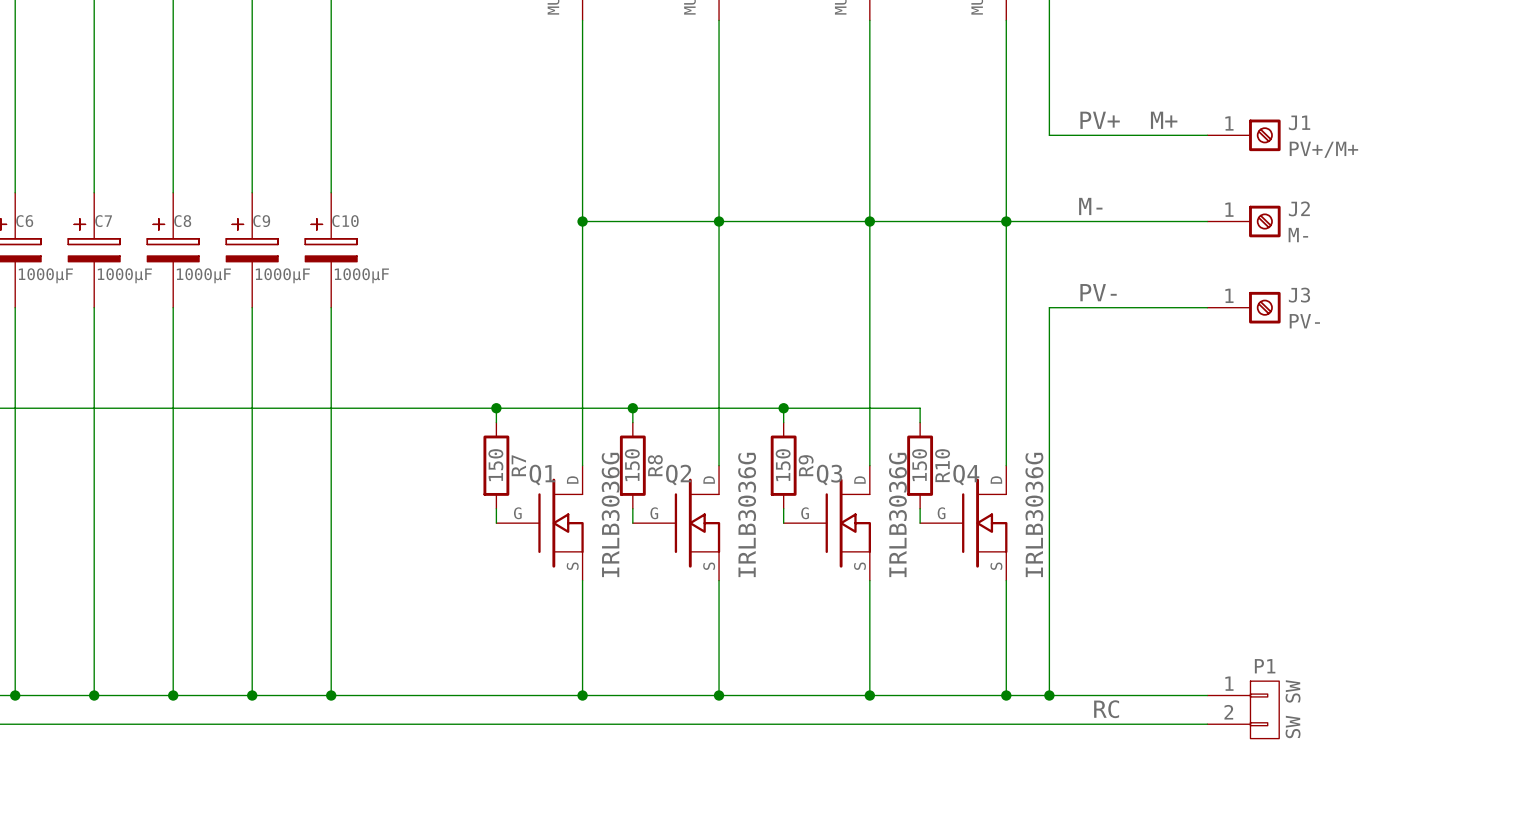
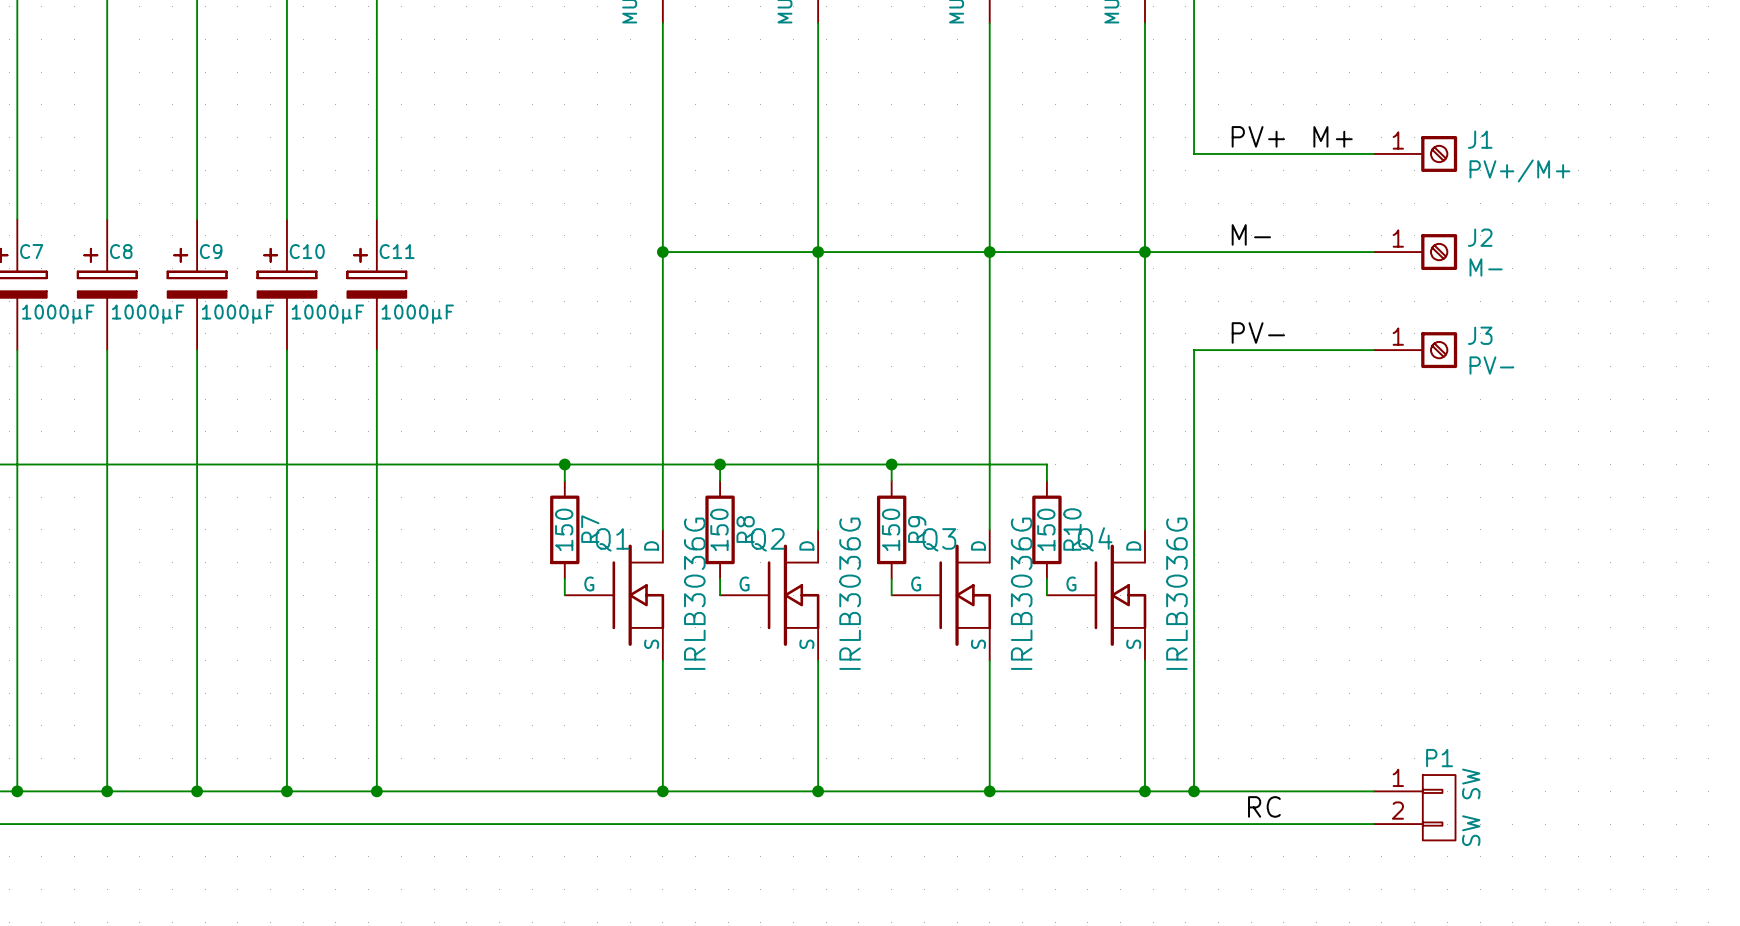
C6 name: C6 (24, 221) -> C7 (31, 251)
C7 name: C7 (103, 221) -> C8 (121, 251)
C8 name: C8 (182, 221) -> C9 (211, 251)
C9 name: C9 (261, 221) -> C10 (307, 251)
C10 name: C10 (345, 221) -> C11 (397, 251)

